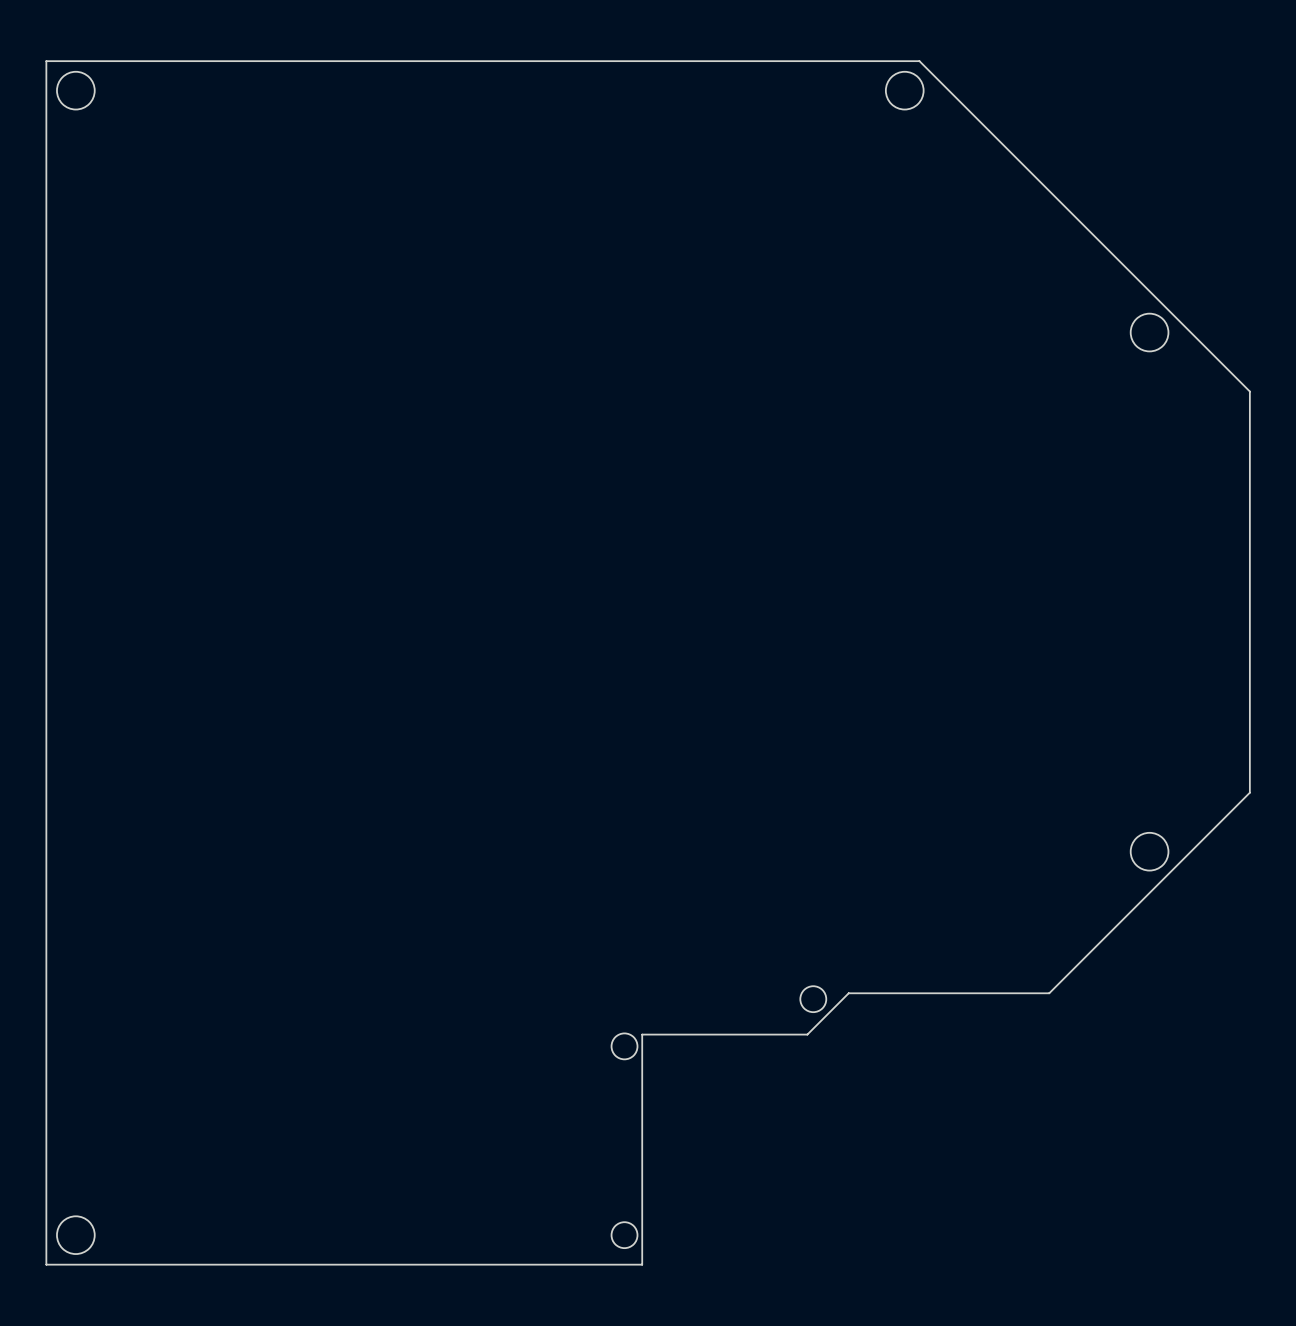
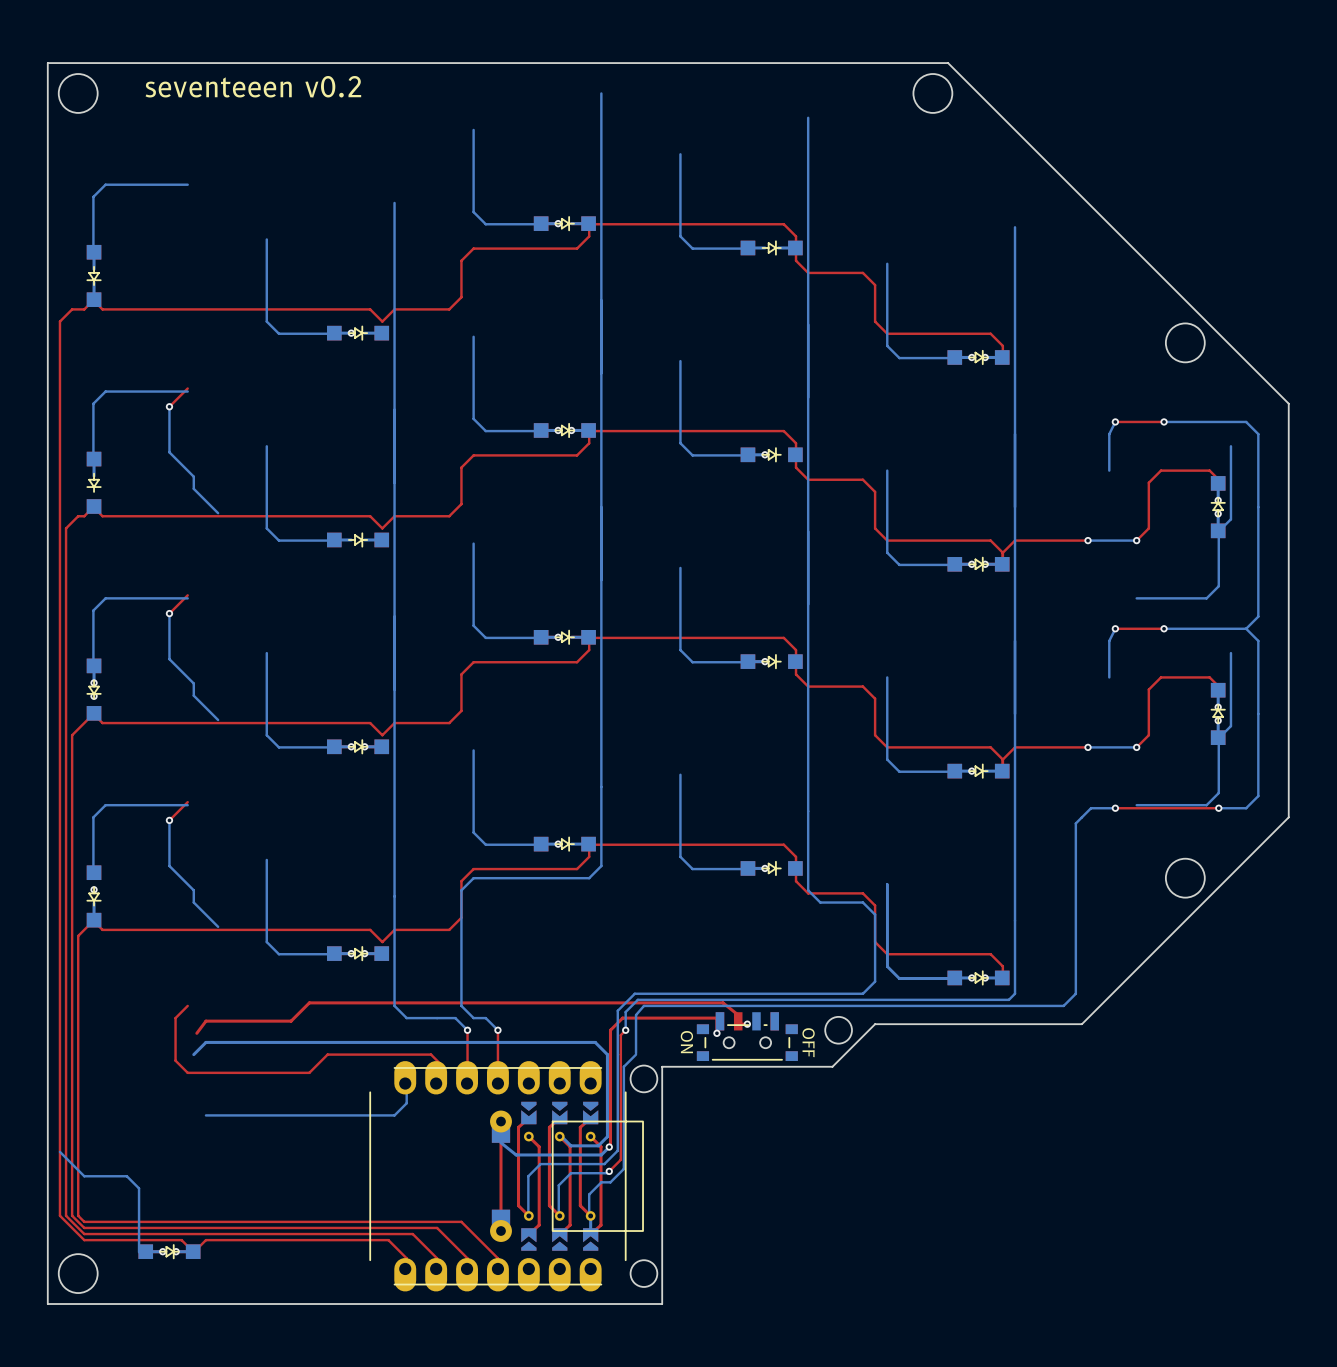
text: none -> seventeeen v0.2 (253, 86)
bottom track: none -> (601, 93) (601, 866) (589, 878) (473, 878) (461, 890) (461, 1005) (473, 1018) (485, 1018) (497, 1030)
bottom track: none -> (808, 117) (808, 890) (820, 902) (862, 902) (875, 914) (875, 981) (862, 993) (634, 993) (617, 1010) (617, 1150) (604, 1164) (540, 1164) (528, 1176) (528, 1215)
bottom track: none -> (473, 129) (473, 212) (485, 224) (534, 224)
bottom track: none -> (680, 154) (680, 236) (692, 248) (741, 248)
bottom track: none -> (187, 184) (105, 184) (93, 196) (93, 245)
bottom track: none -> (394, 202) (394, 1005) (406, 1018) (455, 1018) (467, 1030)
bottom track: none -> (558, 223) (544, 223)
via: none -> (558, 223)
part: none -> (564, 223)
bottom track: none -> (584, 223) (571, 223)
bottom track: none -> (1015, 227) (1015, 993) (1008, 999) (637, 999) (625, 1012) (625, 1030)
bottom track: none -> (266, 239) (266, 321) (278, 333) (327, 333)
bottom track: none -> (764, 247) (751, 247)
part: none -> (771, 247)
bottom track: none -> (791, 247) (778, 247)
bottom track: none -> (94, 255) (94, 269)
bottom track: none -> (887, 263) (887, 345) (899, 358) (948, 358)
part: none -> (94, 275)
bottom track: none -> (94, 282) (94, 296)
top track: none -> (90, 297) (102, 309) (370, 309) (382, 321) (394, 309) (449, 309) (461, 297) (461, 260) (473, 248) (577, 248) (589, 236) (589, 224) (783, 224) (796, 236) (796, 260) (808, 272) (862, 272) (875, 285) (875, 321) (887, 333) (990, 333) (1002, 345) (1002, 358)
top track: none -> (96, 297) (84, 309) (72, 309) (59, 321) (59, 1215) (84, 1240) (181, 1240) (193, 1252) (205, 1240) (388, 1240) (406, 1258) (406, 1267)
bottom track: none -> (351, 333) (337, 333)
via: none -> (351, 333)
part: none -> (358, 333)
bottom track: none -> (378, 333) (364, 333)
bottom track: none -> (473, 336) (473, 418) (485, 431) (534, 431)
bottom track: none -> (971, 357) (958, 357)
via: none -> (971, 357)
part: none -> (978, 357)
via: none -> (985, 357)
bottom track: none -> (998, 357) (985, 357)
bottom track: none -> (680, 361) (680, 443) (692, 455) (741, 455)
top track: none -> (187, 388) (169, 406)
bottom track: none -> (187, 391) (105, 391) (93, 403) (93, 452)
bottom track: none -> (169, 406) (169, 452) (193, 476) (193, 488) (218, 513)
via: none -> (169, 406)
bottom track: none -> (1115, 421) (1109, 434) (1109, 470)
via: none -> (1115, 421)
top track: none -> (1164, 421) (1115, 421)
bottom track: none -> (1164, 421) (1246, 421) (1258, 434) (1258, 616) (1246, 628)
via: none -> (1164, 421)
bottom track: none -> (558, 430) (544, 430)
via: none -> (558, 430)
part: none -> (564, 430)
via: none -> (571, 430)
bottom track: none -> (584, 430) (571, 430)
bottom track: none -> (266, 446) (266, 528) (278, 540) (327, 540)
bottom track: none -> (1230, 446) (1230, 519) (1218, 531) (1218, 586) (1206, 598) (1136, 598)
bottom track: none -> (764, 454) (751, 454)
via: none -> (764, 454)
part: none -> (771, 454)
bottom track: none -> (94, 462) (94, 476)
bottom track: none -> (887, 470) (887, 552) (899, 564) (948, 564)
part: none -> (94, 482)
top track: none -> (1221, 482) (1209, 470) (1161, 470) (1148, 482) (1148, 528) (1136, 540)
bottom track: none -> (1218, 487) (1218, 500)
via: none -> (1218, 500)
top track: none -> (90, 504) (102, 516) (370, 516) (382, 528) (394, 516) (449, 516) (461, 504) (461, 467) (473, 455) (577, 455) (589, 443) (589, 431) (783, 431) (796, 443) (796, 467) (808, 479) (862, 479) (875, 491) (875, 528) (887, 540) (990, 540) (1002, 552)
top track: none -> (96, 504) (84, 516) (78, 516) (66, 528) (66, 1215) (84, 1234) (412, 1234) (437, 1258) (437, 1270)
part: none -> (1218, 507)
bottom track: none -> (1218, 513) (1218, 527)
via: none -> (1218, 513)
bottom track: none -> (351, 539) (337, 539)
part: none -> (358, 539)
bottom track: none -> (378, 539) (364, 539)
top track: none -> (1088, 540) (1015, 540) (1002, 552)
via: none -> (1088, 540)
bottom track: none -> (1136, 540) (1088, 540)
via: none -> (1136, 540)
bottom track: none -> (473, 543) (473, 625) (485, 637) (534, 637)
bottom track: none -> (971, 564) (958, 564)
via: none -> (971, 564)
part: none -> (978, 564)
via: none -> (985, 564)
bottom track: none -> (998, 564) (985, 564)
bottom track: none -> (680, 567) (680, 650) (692, 662) (741, 662)
top track: none -> (187, 595) (169, 613)
bottom track: none -> (187, 598) (105, 598) (93, 610) (93, 659)
bottom track: none -> (169, 613) (169, 659) (193, 683) (193, 695) (218, 720)
via: none -> (169, 613)
bottom track: none -> (1115, 628) (1109, 640) (1109, 677)
via: none -> (1115, 628)
top track: none -> (1164, 628) (1115, 628)
via: none -> (1164, 628)
bottom track: none -> (1246, 628) (1164, 628)
bottom track: none -> (1246, 628) (1258, 640) (1258, 796) (1246, 808) (1218, 808)
bottom track: none -> (558, 637) (544, 637)
via: none -> (558, 637)
part: none -> (564, 637)
bottom track: none -> (584, 637) (571, 637)
bottom track: none -> (266, 653) (266, 735) (278, 747) (327, 747)
bottom track: none -> (1230, 653) (1230, 726) (1218, 738) (1218, 793) (1206, 805) (1136, 805)
bottom track: none -> (764, 661) (751, 661)
via: none -> (764, 661)
part: none -> (771, 661)
bottom track: none -> (94, 669) (94, 682)
bottom track: none -> (887, 677) (887, 759) (899, 771) (948, 771)
via: none -> (94, 682)
part: none -> (94, 689)
top track: none -> (1221, 689) (1209, 677) (1161, 677) (1148, 689) (1148, 735) (1136, 747)
bottom track: none -> (1218, 693) (1218, 707)
via: none -> (94, 696)
via: none -> (1218, 707)
top track: none -> (90, 710) (102, 723) (370, 723) (382, 735) (394, 723) (449, 723) (461, 710) (461, 674) (473, 662) (577, 662) (589, 650) (589, 637) (783, 637) (796, 650) (796, 674) (808, 686) (862, 686) (875, 698) (875, 735) (887, 747) (990, 747) (1002, 759)
top track: none -> (96, 710) (72, 735) (72, 1215) (84, 1227) (437, 1227) (467, 1258) (467, 1267)
part: none -> (1218, 713)
bottom track: none -> (1218, 720) (1218, 734)
via: none -> (1218, 720)
bottom track: none -> (351, 746) (337, 746)
via: none -> (351, 746)
part: none -> (358, 746)
via: none -> (364, 746)
bottom track: none -> (378, 746) (364, 746)
top track: none -> (1088, 747) (1015, 747) (1002, 759)
via: none -> (1088, 747)
bottom track: none -> (1136, 747) (1088, 747)
via: none -> (1136, 747)
bottom track: none -> (473, 750) (473, 832) (485, 844) (534, 844)
bottom track: none -> (971, 771) (958, 771)
via: none -> (971, 771)
part: none -> (978, 771)
bottom track: none -> (998, 771) (985, 771)
bottom track: none -> (680, 774) (680, 856) (692, 869) (741, 869)
top track: none -> (187, 802) (169, 820)
bottom track: none -> (187, 805) (105, 805) (93, 817) (93, 866)
bottom track: none -> (1115, 808) (1091, 808) (1075, 823) (1075, 993) (1063, 1005) (643, 1005) (636, 1015) (636, 1053)
via: none -> (1115, 808)
top track: none -> (1218, 808) (1115, 808)
via: none -> (1218, 808)
bottom track: none -> (169, 820) (169, 866) (193, 890) (193, 902) (218, 926)
via: none -> (169, 820)
bottom track: none -> (558, 844) (544, 844)
via: none -> (558, 844)
part: none -> (564, 844)
bottom track: none -> (584, 844) (571, 844)
bottom track: none -> (266, 859) (266, 942) (278, 954) (327, 954)
bottom track: none -> (764, 868) (751, 868)
via: none -> (764, 868)
part: none -> (771, 868)
bottom track: none -> (887, 884) (887, 966) (899, 978) (948, 978)
via: none -> (94, 889)
part: none -> (94, 896)
bottom track: none -> (94, 903) (94, 916)
top track: none -> (90, 917) (102, 929) (370, 929) (382, 942) (394, 929) (449, 929) (461, 917) (461, 881) (473, 869) (577, 869) (589, 856) (589, 844) (783, 844) (796, 856) (796, 881) (808, 893) (862, 893) (875, 905) (875, 942) (887, 954) (990, 954) (1002, 966) (1002, 978)
top track: none -> (96, 917) (78, 935) (78, 1215) (84, 1221) (461, 1221) (497, 1258) (497, 1267)
bottom track: none -> (351, 953) (337, 953)
via: none -> (351, 953)
part: none -> (358, 953)
via: none -> (364, 953)
bottom track: none -> (378, 953) (364, 953)
bottom track: none -> (971, 977) (958, 977)
via: none -> (971, 977)
part: none -> (978, 977)
via: none -> (985, 977)
bottom track: none -> (998, 977) (985, 977)
top track: none -> (187, 1005) (175, 1018) (175, 1060) (187, 1072) (309, 1072) (327, 1054) (431, 1054) (443, 1066) (437, 1085)
top track: none -> (747, 1024) (738, 1024) (738, 1015) (723, 1002) (309, 1002) (291, 1021) (205, 1021) (196, 1033)
via: none -> (747, 1024)
top track: none -> (467, 1030) (467, 1085)
via: none -> (467, 1030)
top track: none -> (497, 1030) (497, 1085)
via: none -> (497, 1030)
top track: none -> (625, 1030) (620, 1035) (620, 1159) (609, 1171)
via: none -> (625, 1030)
top track: none -> (716, 1033) (716, 1018) (622, 1018) (610, 1030) (609, 1147)
via: none -> (716, 1033)
part: none -> (747, 1036)
bottom track: none -> (193, 1054) (205, 1042) (595, 1042) (607, 1054) (607, 1136) (598, 1145) (570, 1145) (558, 1133)
bottom track: none -> (636, 1054) (623, 1066) (623, 1168) (610, 1182) (601, 1182) (589, 1194) (589, 1218)
bottom track: none -> (406, 1085) (406, 1103) (394, 1115) (205, 1115)
top track: none -> (528, 1118) (518, 1127) (518, 1205) (528, 1215)
top track: none -> (559, 1118) (549, 1127) (549, 1205) (559, 1215)
top track: none -> (590, 1118) (580, 1127) (580, 1205) (590, 1215)
top track: none -> (500, 1121) (500, 1231)
part: none -> (500, 1121)
part: none -> (500, 1133)
top track: none -> (528, 1136) (539, 1146) (539, 1225) (528, 1234)
top track: none -> (559, 1136) (570, 1146) (570, 1225) (559, 1234)
top track: none -> (590, 1136) (600, 1146) (600, 1225) (590, 1234)
bottom track: none -> (500, 1142) (516, 1154) (601, 1154) (609, 1147)
via: none -> (609, 1147)
bottom track: none -> (59, 1151) (84, 1176) (126, 1176) (139, 1188) (139, 1252)
bottom track: none -> (609, 1171) (607, 1173) (570, 1173) (558, 1185) (558, 1215)
via: none -> (609, 1171)
part: none -> (506, 1176)
bottom track: none -> (590, 1215) (590, 1234)
part: none -> (500, 1218)
part: none -> (500, 1231)
bottom track: none -> (162, 1251) (149, 1251)
via: none -> (162, 1251)
part: none -> (169, 1251)
via: none -> (176, 1251)
bottom track: none -> (189, 1251) (176, 1251)

